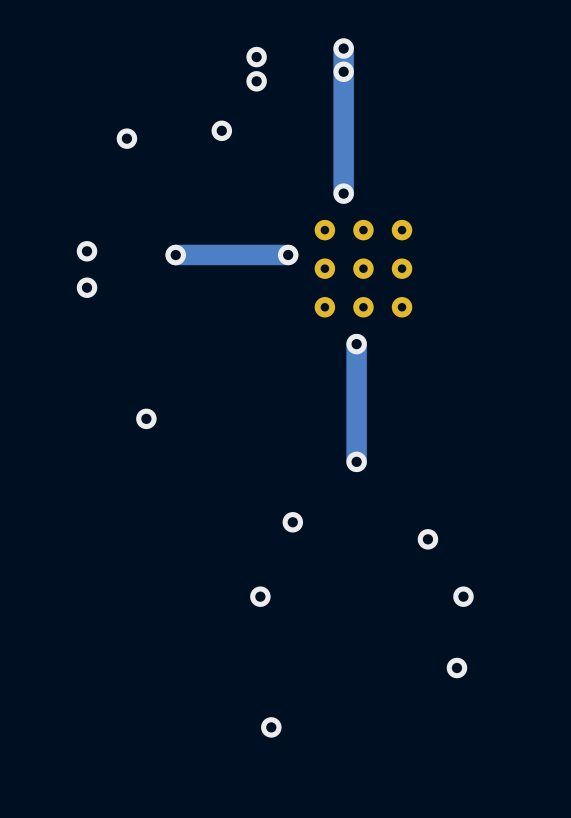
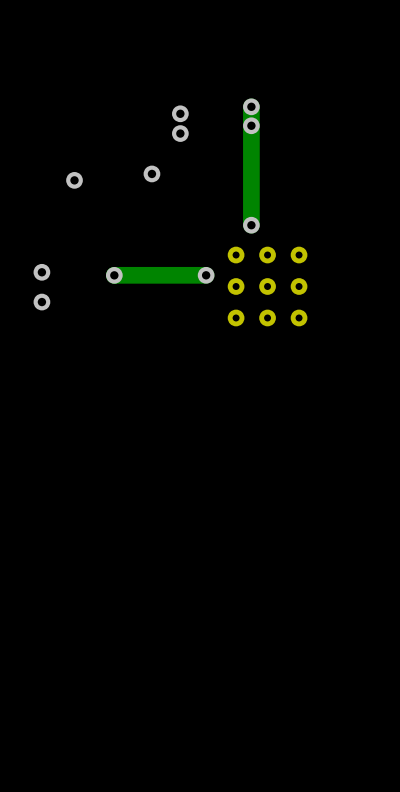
track: (356, 344) (356, 461) -> none
via: (356, 344) -> none
via: (146, 418) -> none
via: (356, 461) -> none
via: (292, 522) -> none
via: (427, 539) -> none
via: (260, 596) -> none
via: (463, 596) -> none
via: (456, 668) -> none
via: (271, 727) -> none

